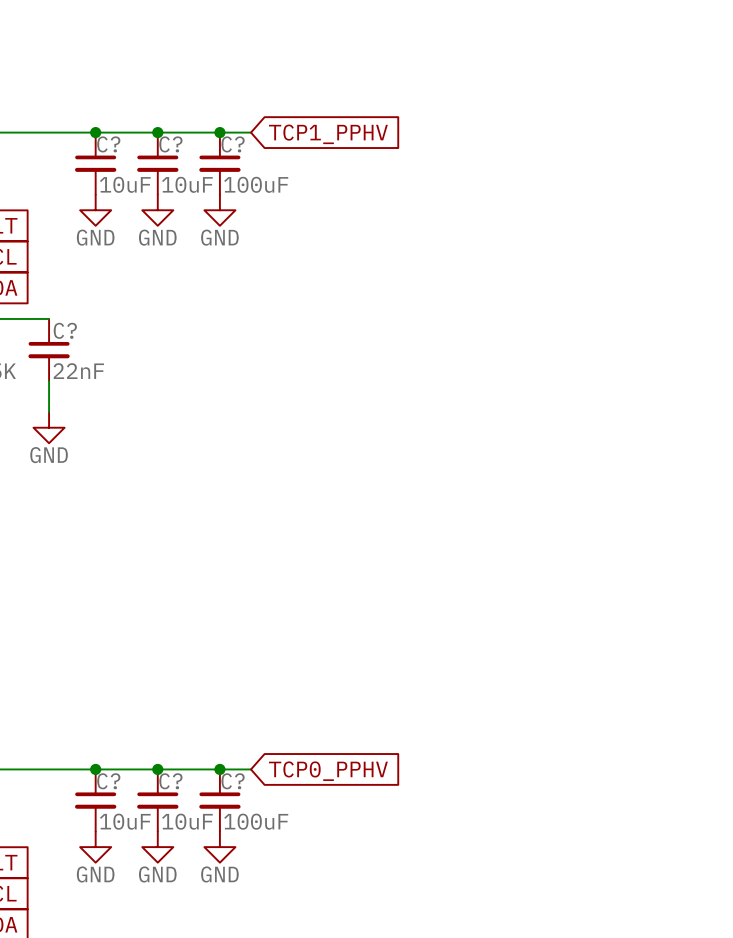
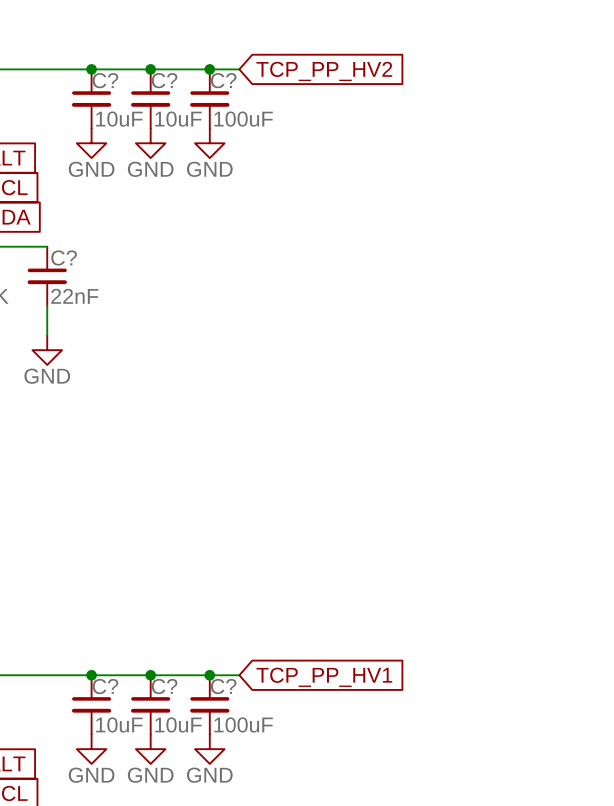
global label: TCP1_PPHV (328, 134) -> TCP_PP_HV2 (324, 71)
global label: TCP0_PPHV (328, 771) -> TCP_PP_HV1 (324, 677)

